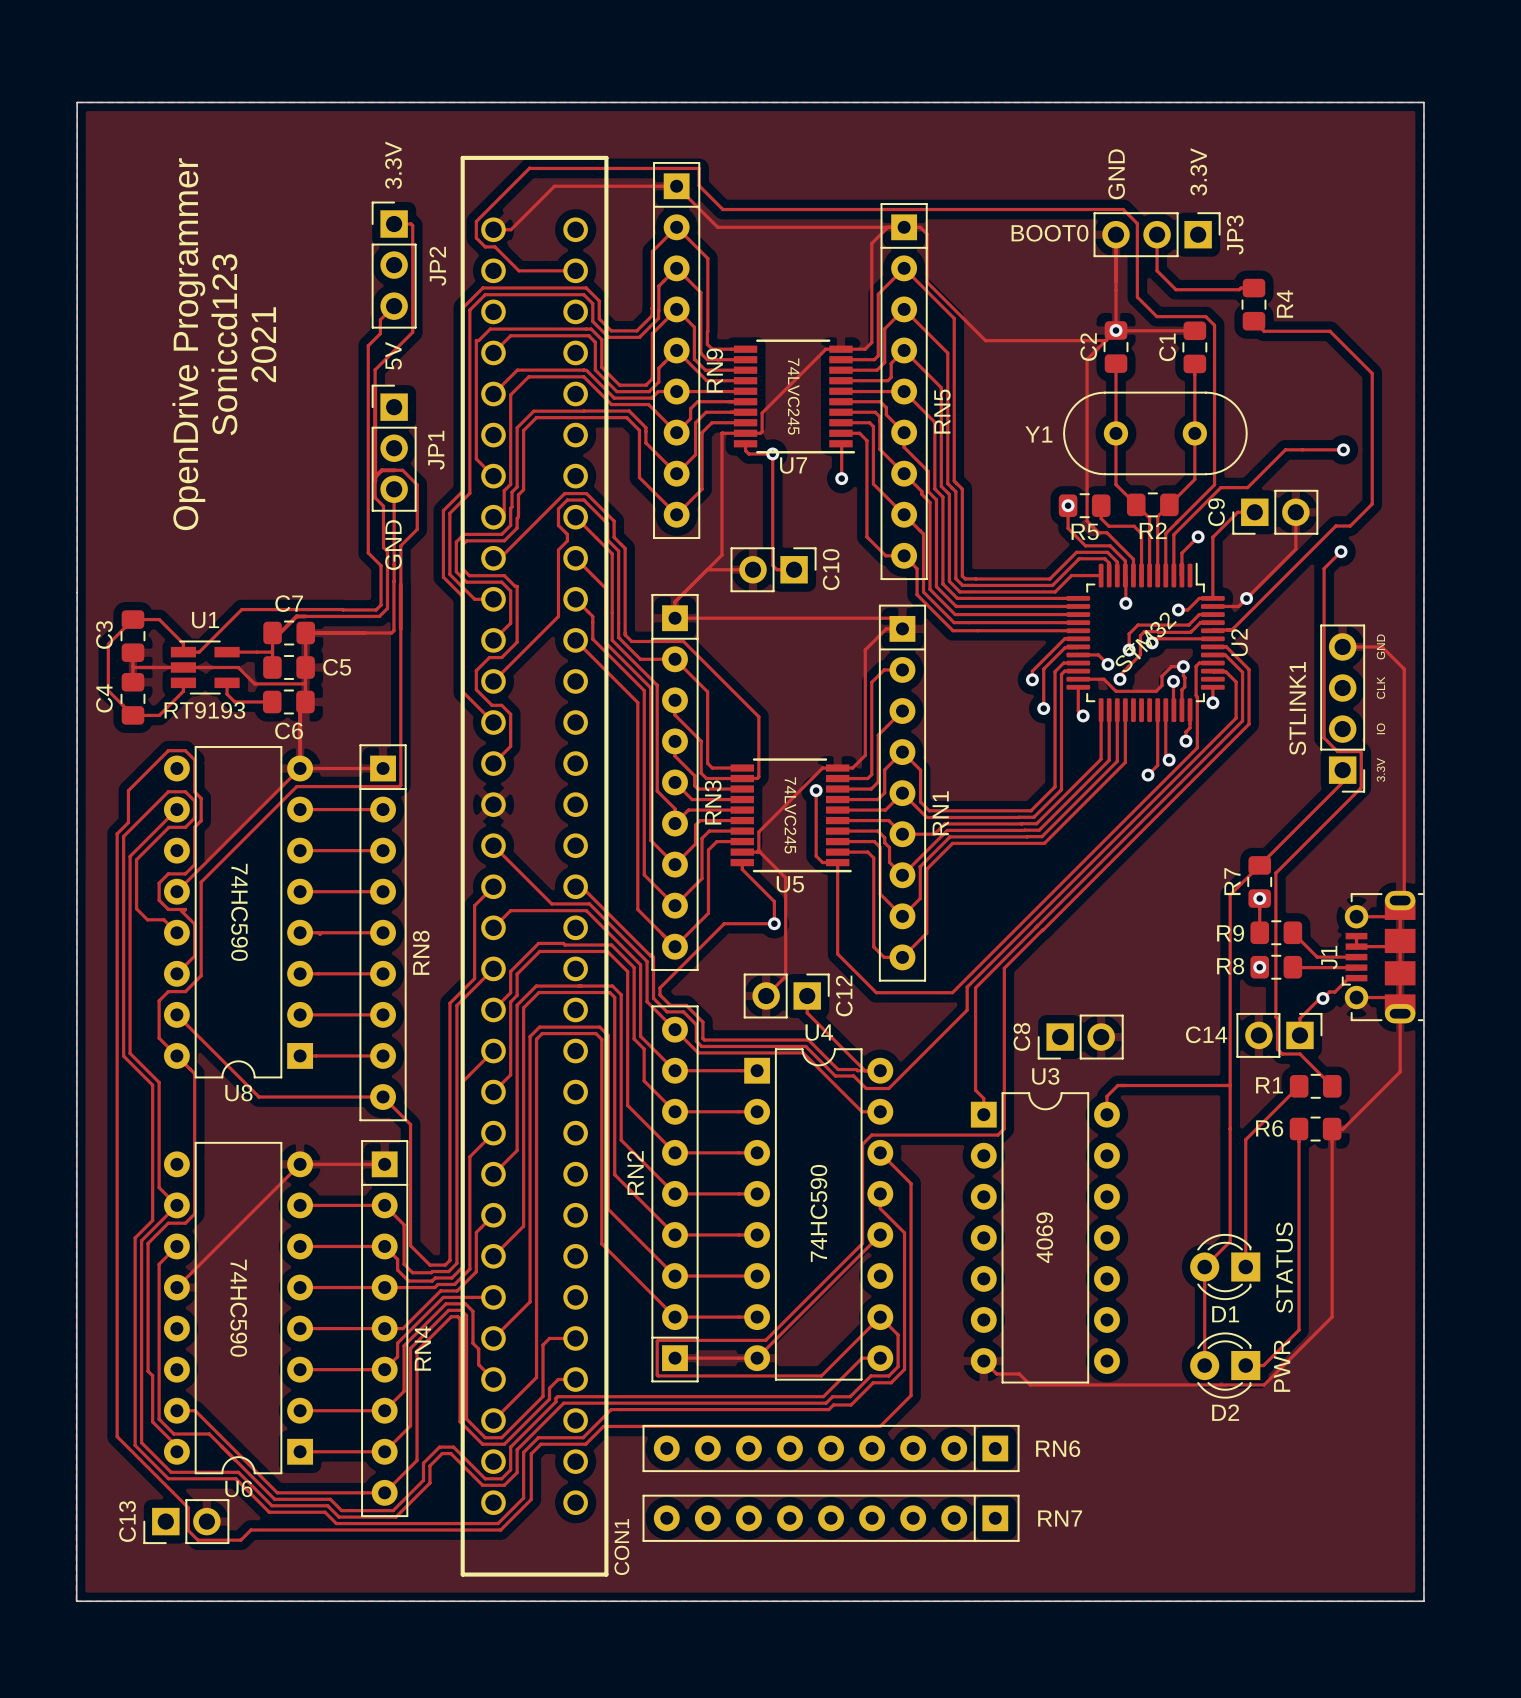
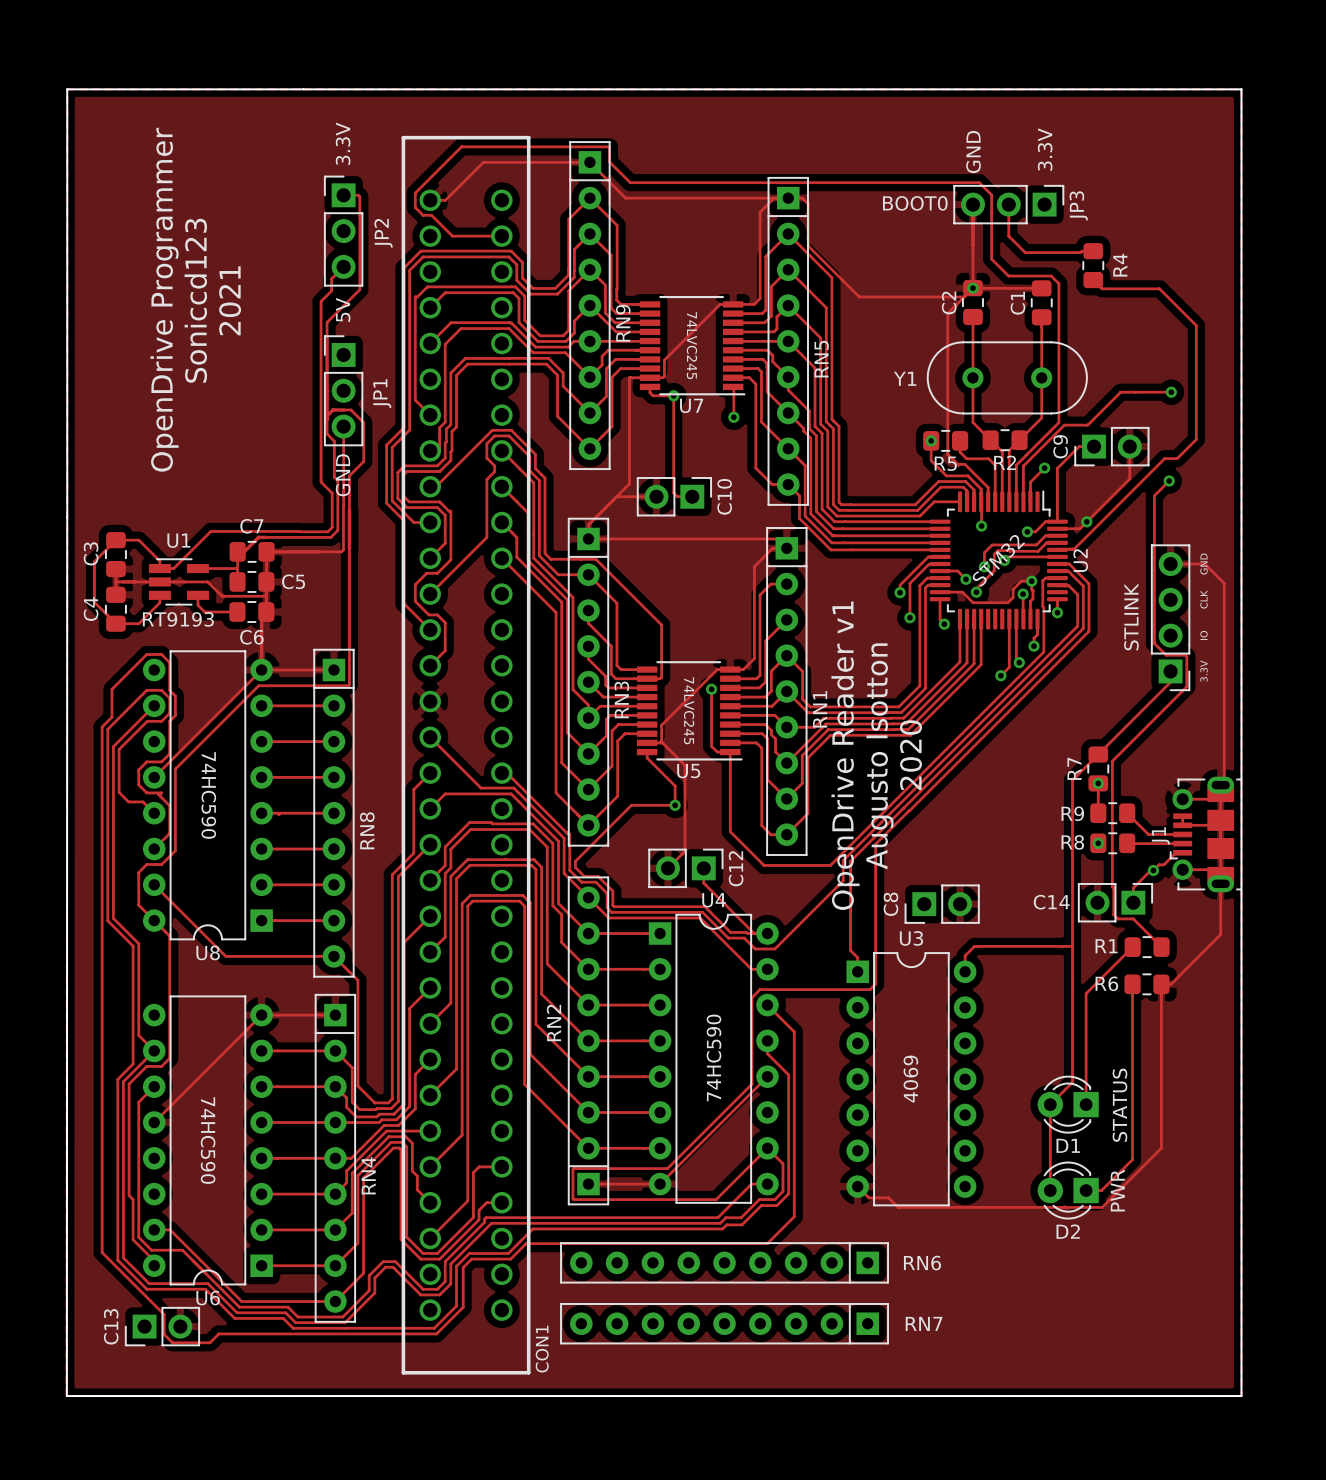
STLINK1 name: STLINK1 (1297, 708) -> STLINK (1131, 616)
text: none -> OpenDrive Reader v1 (845, 755)
text: none -> 2020 (911, 755)
text: none -> Augusto Isotton (879, 756)

